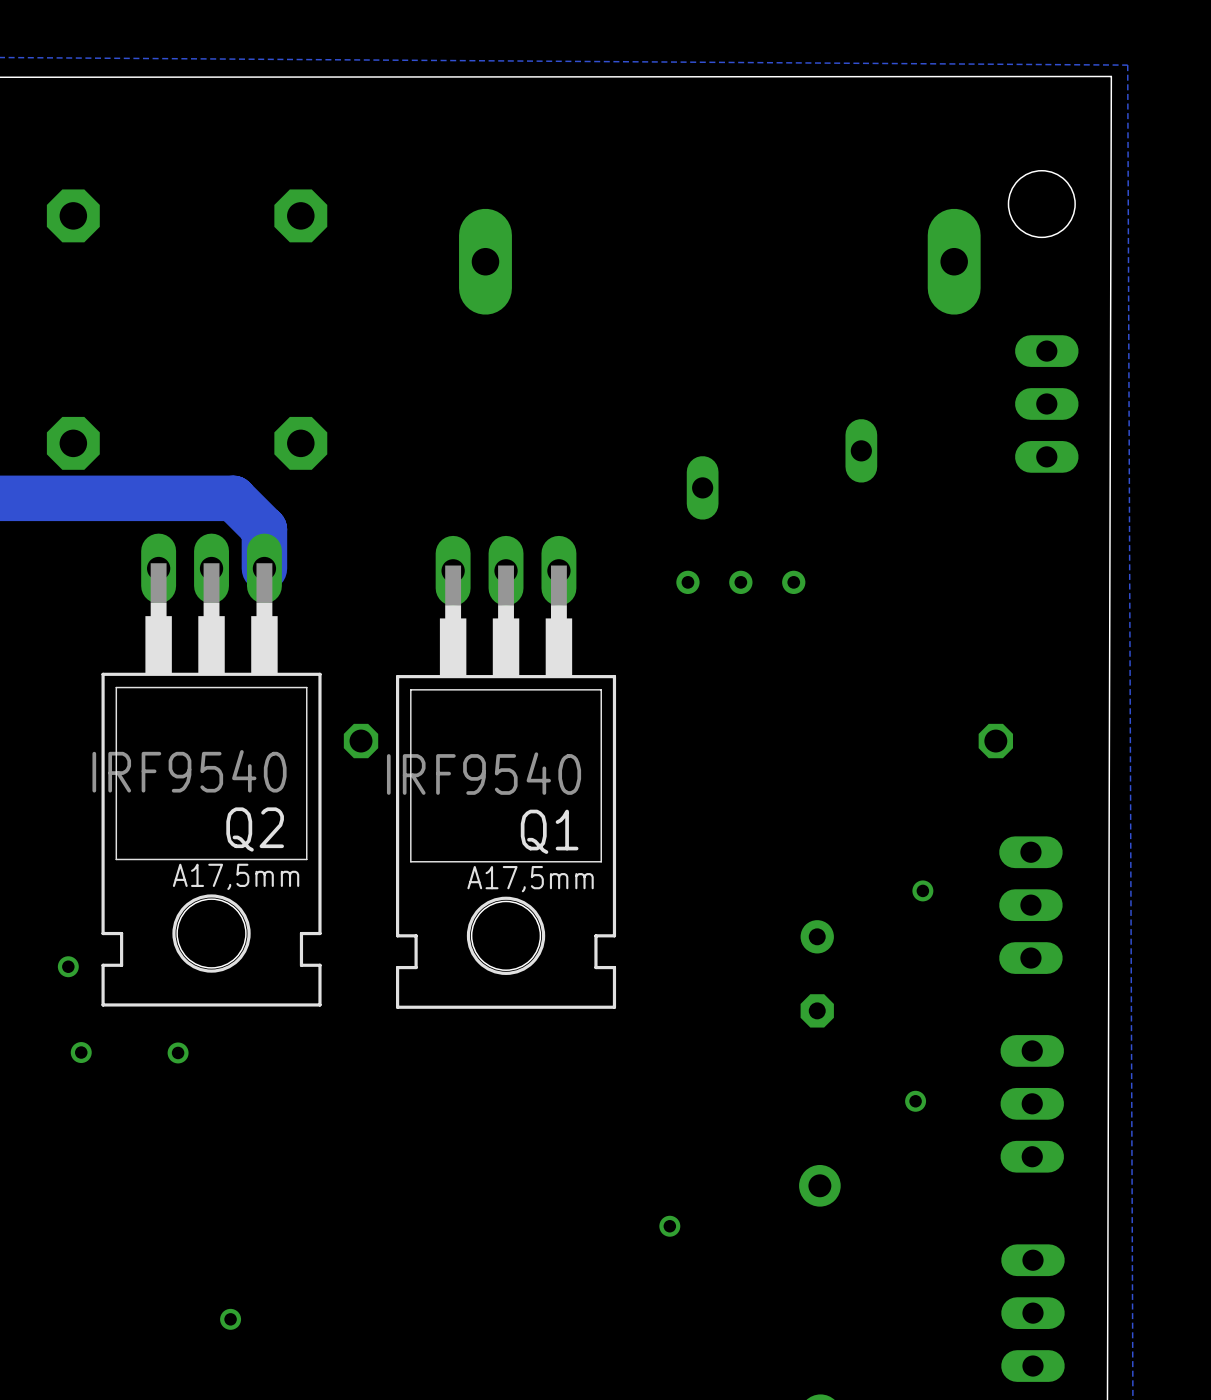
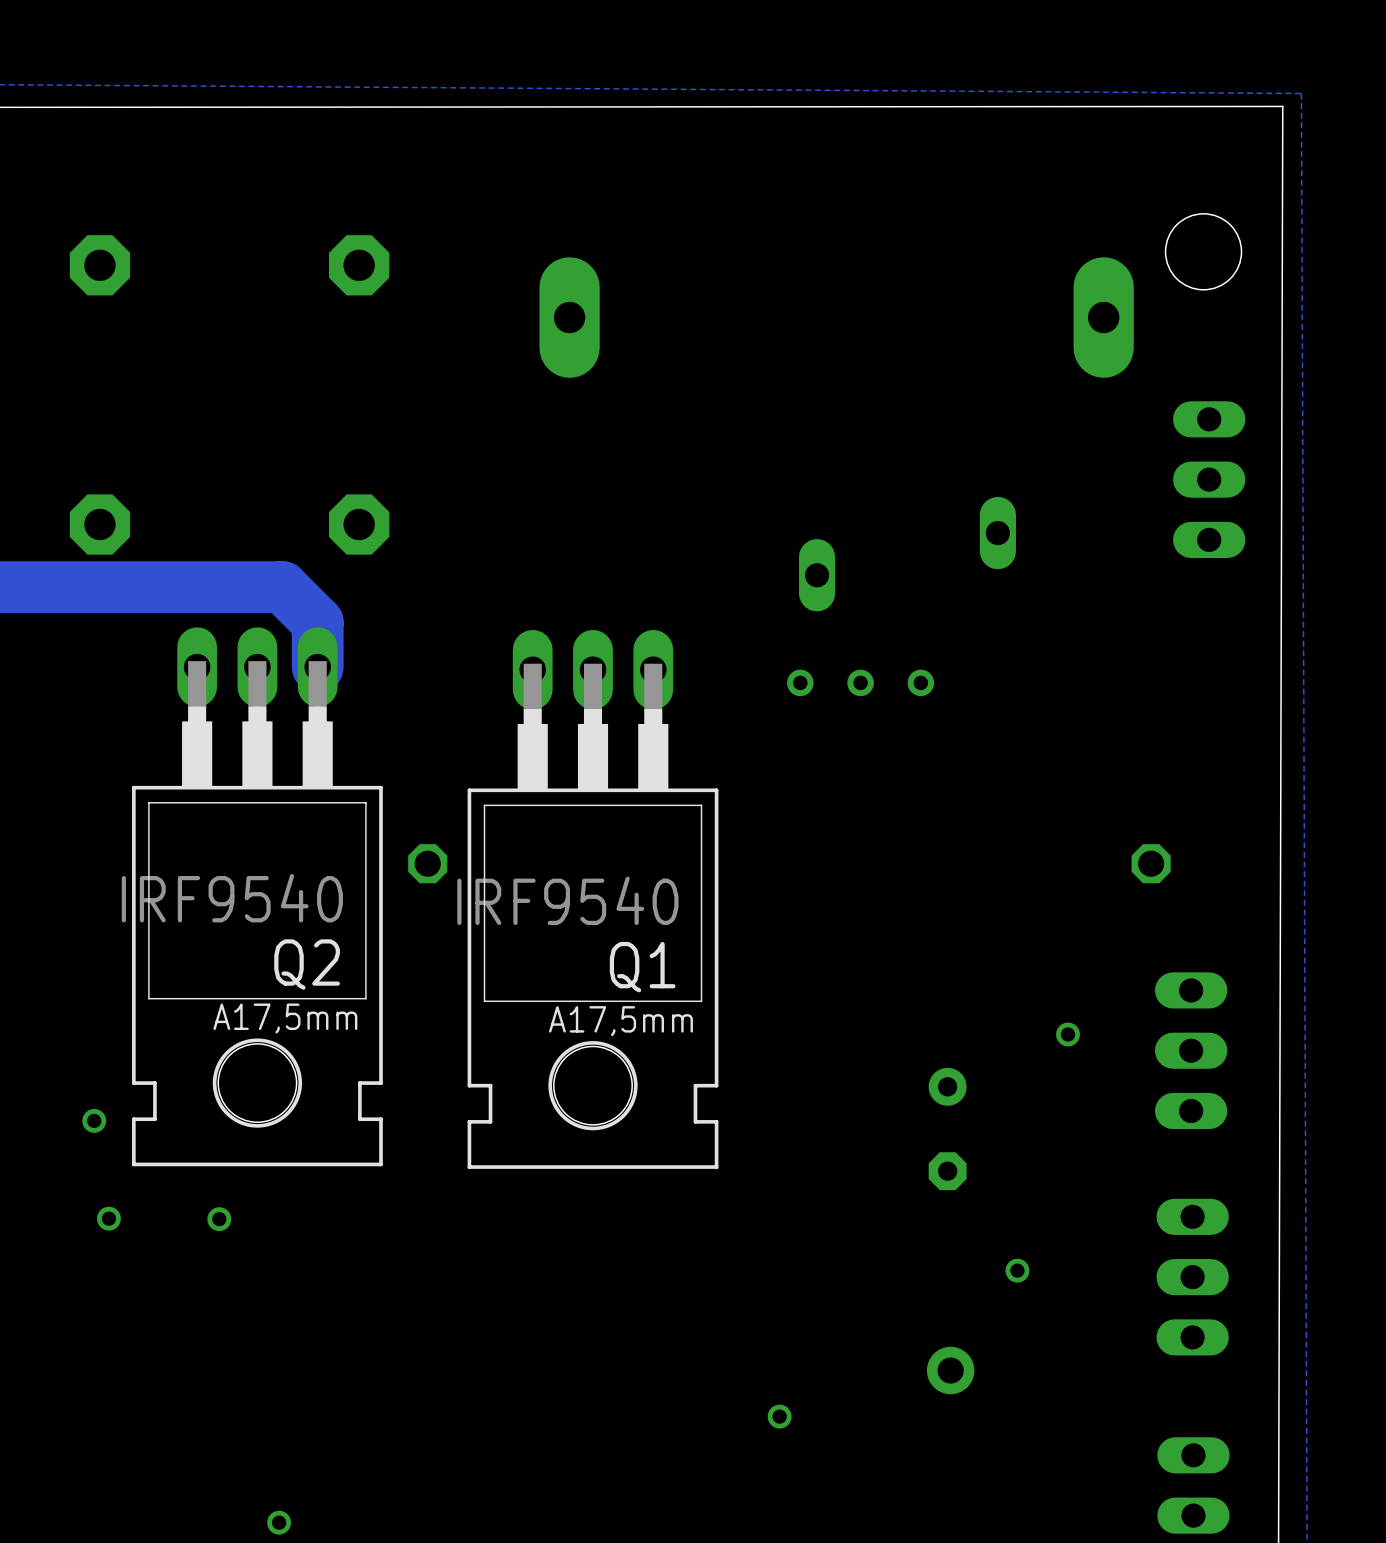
via position: (915, 1101) -> (1017, 1270)

